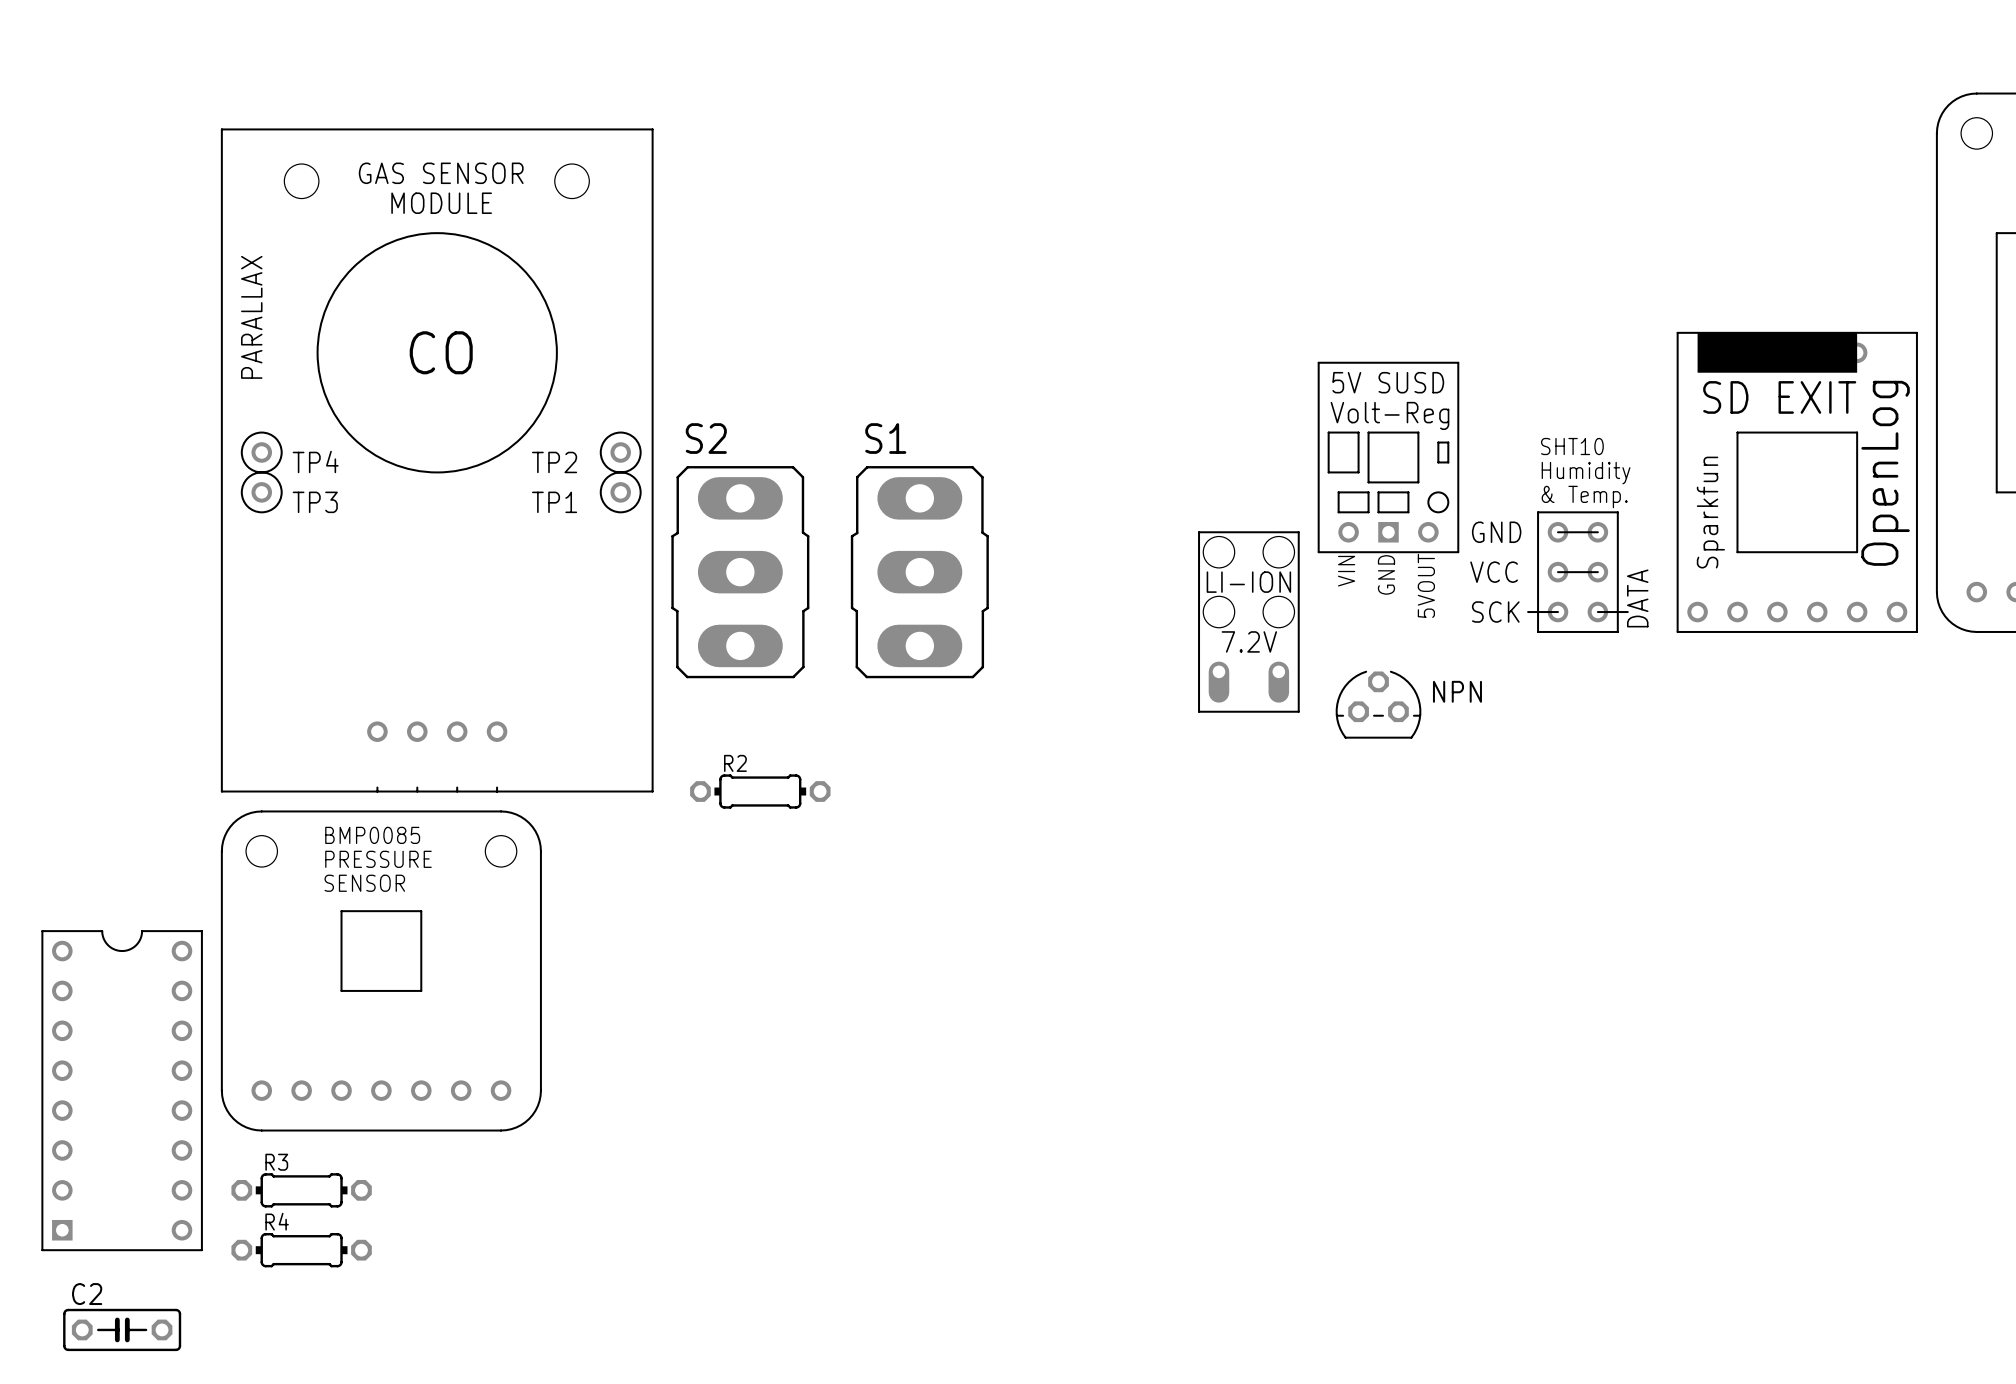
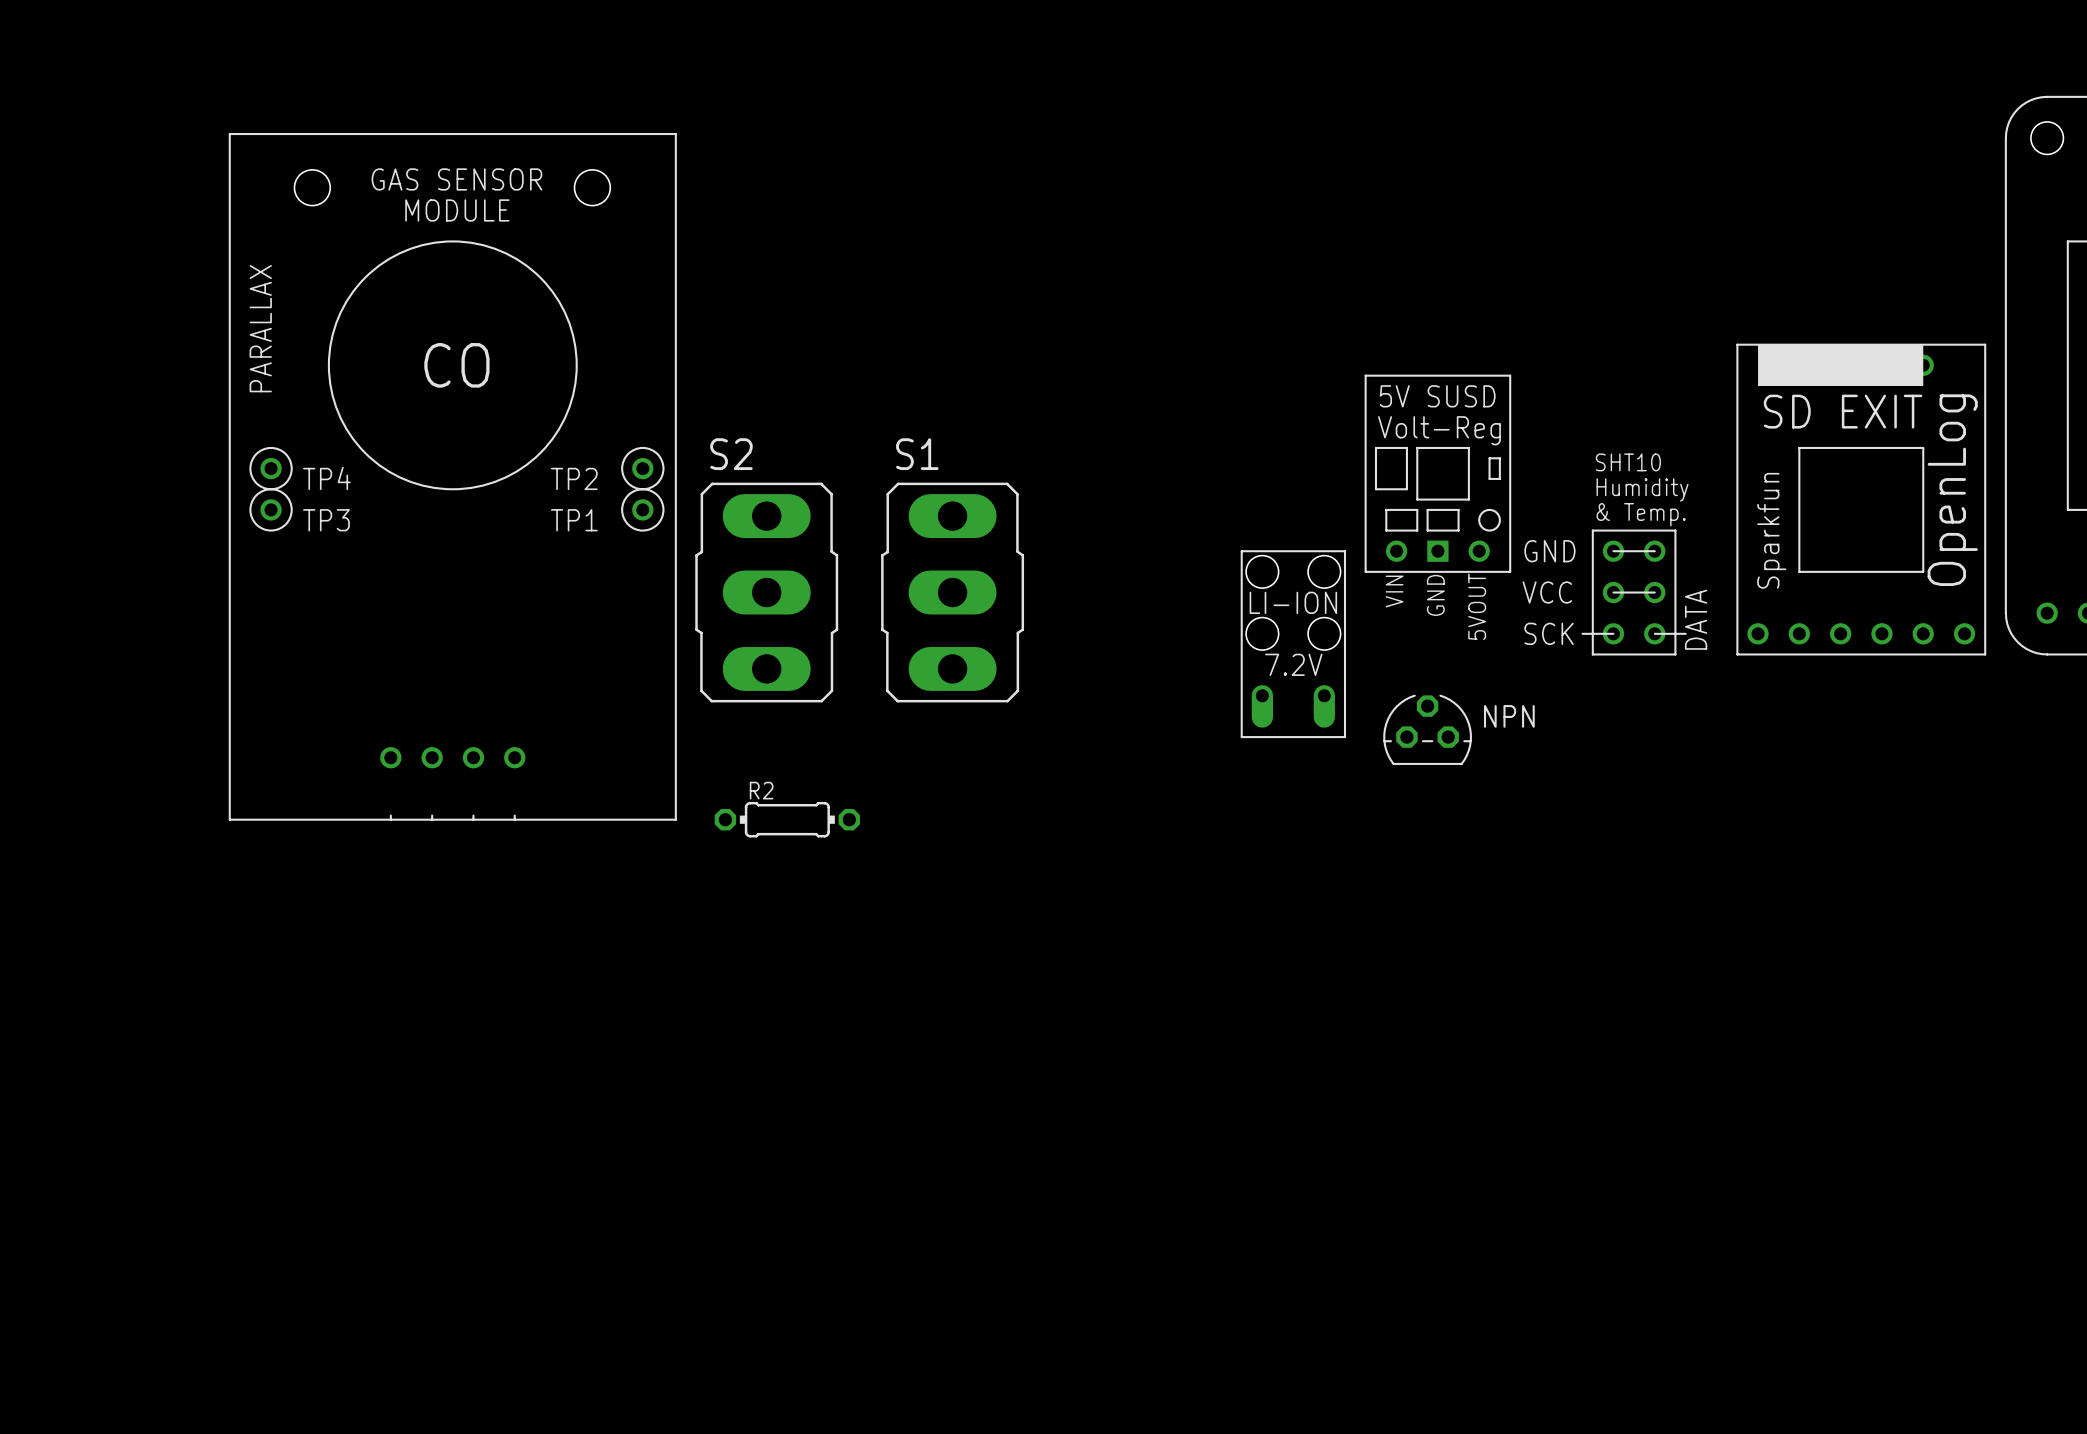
part: (381, 970) -> none
part: (122, 1090) -> none
R3: (301, 1190) -> none
R4: (301, 1250) -> none
C2: (122, 1329) -> none

